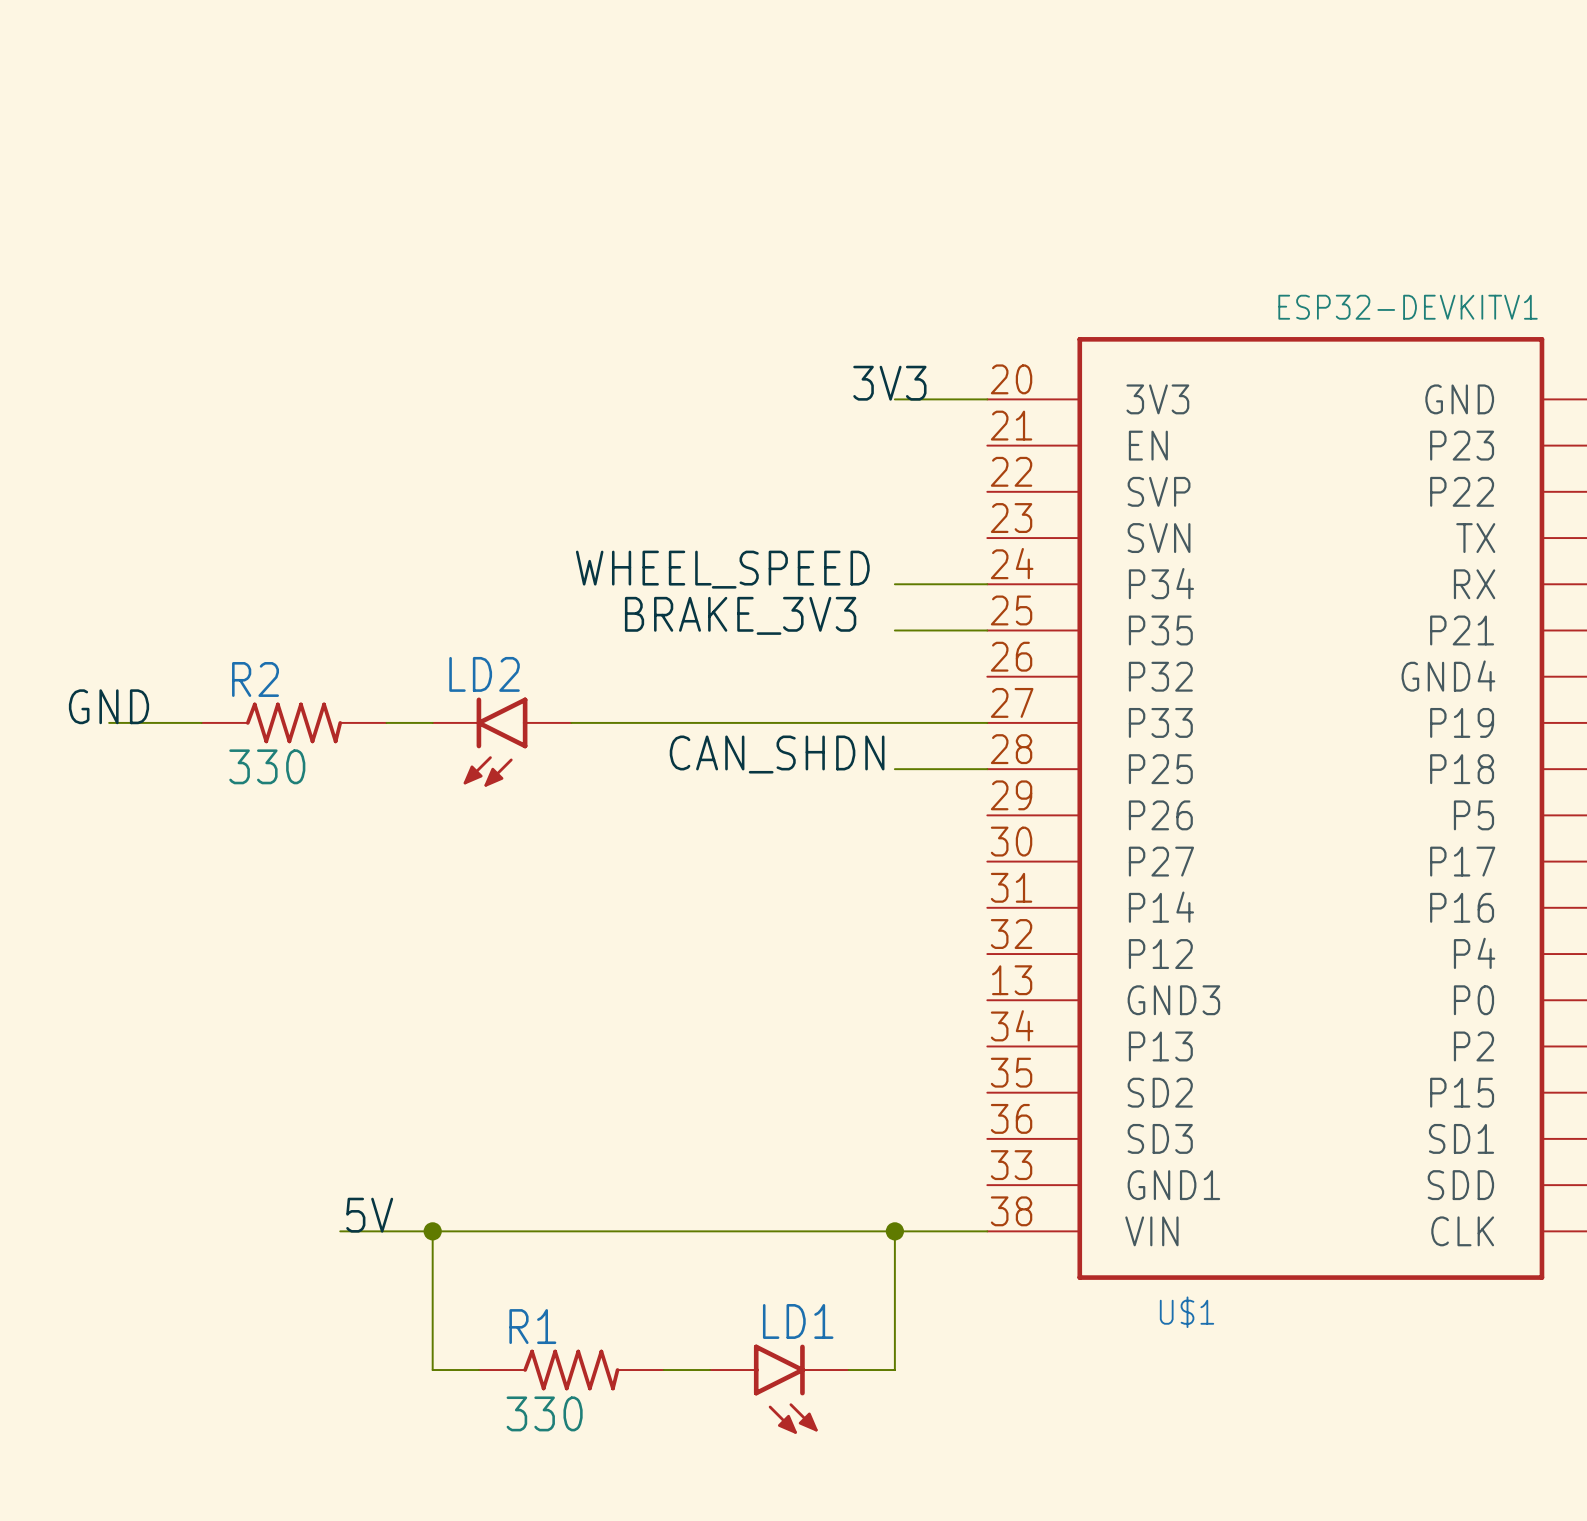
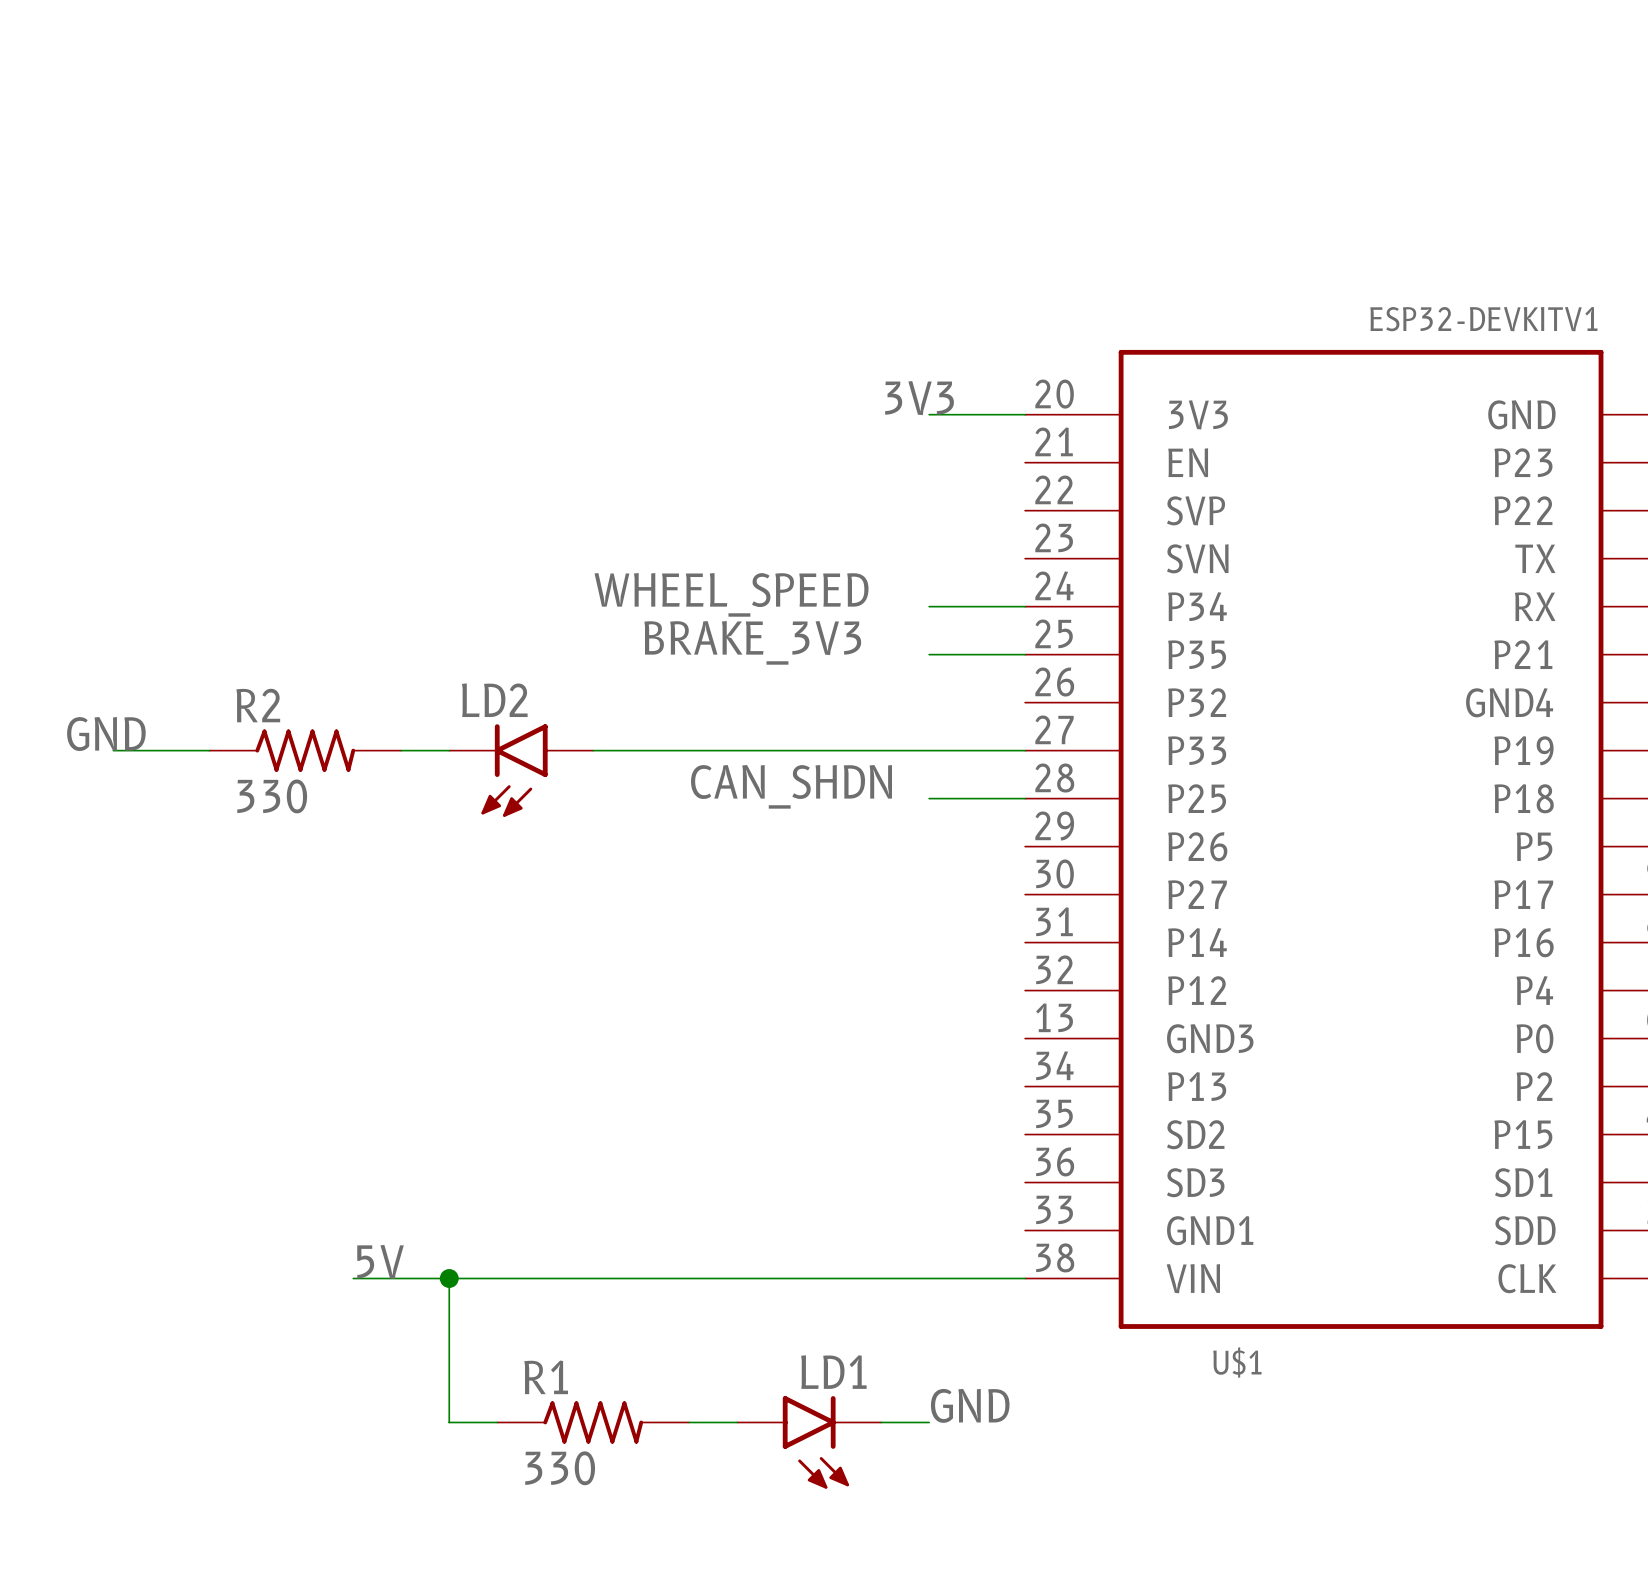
wire: (894, 1231) (894, 1370) -> none
junction: (894, 1231) -> none
label: none -> GND (970, 1405)

